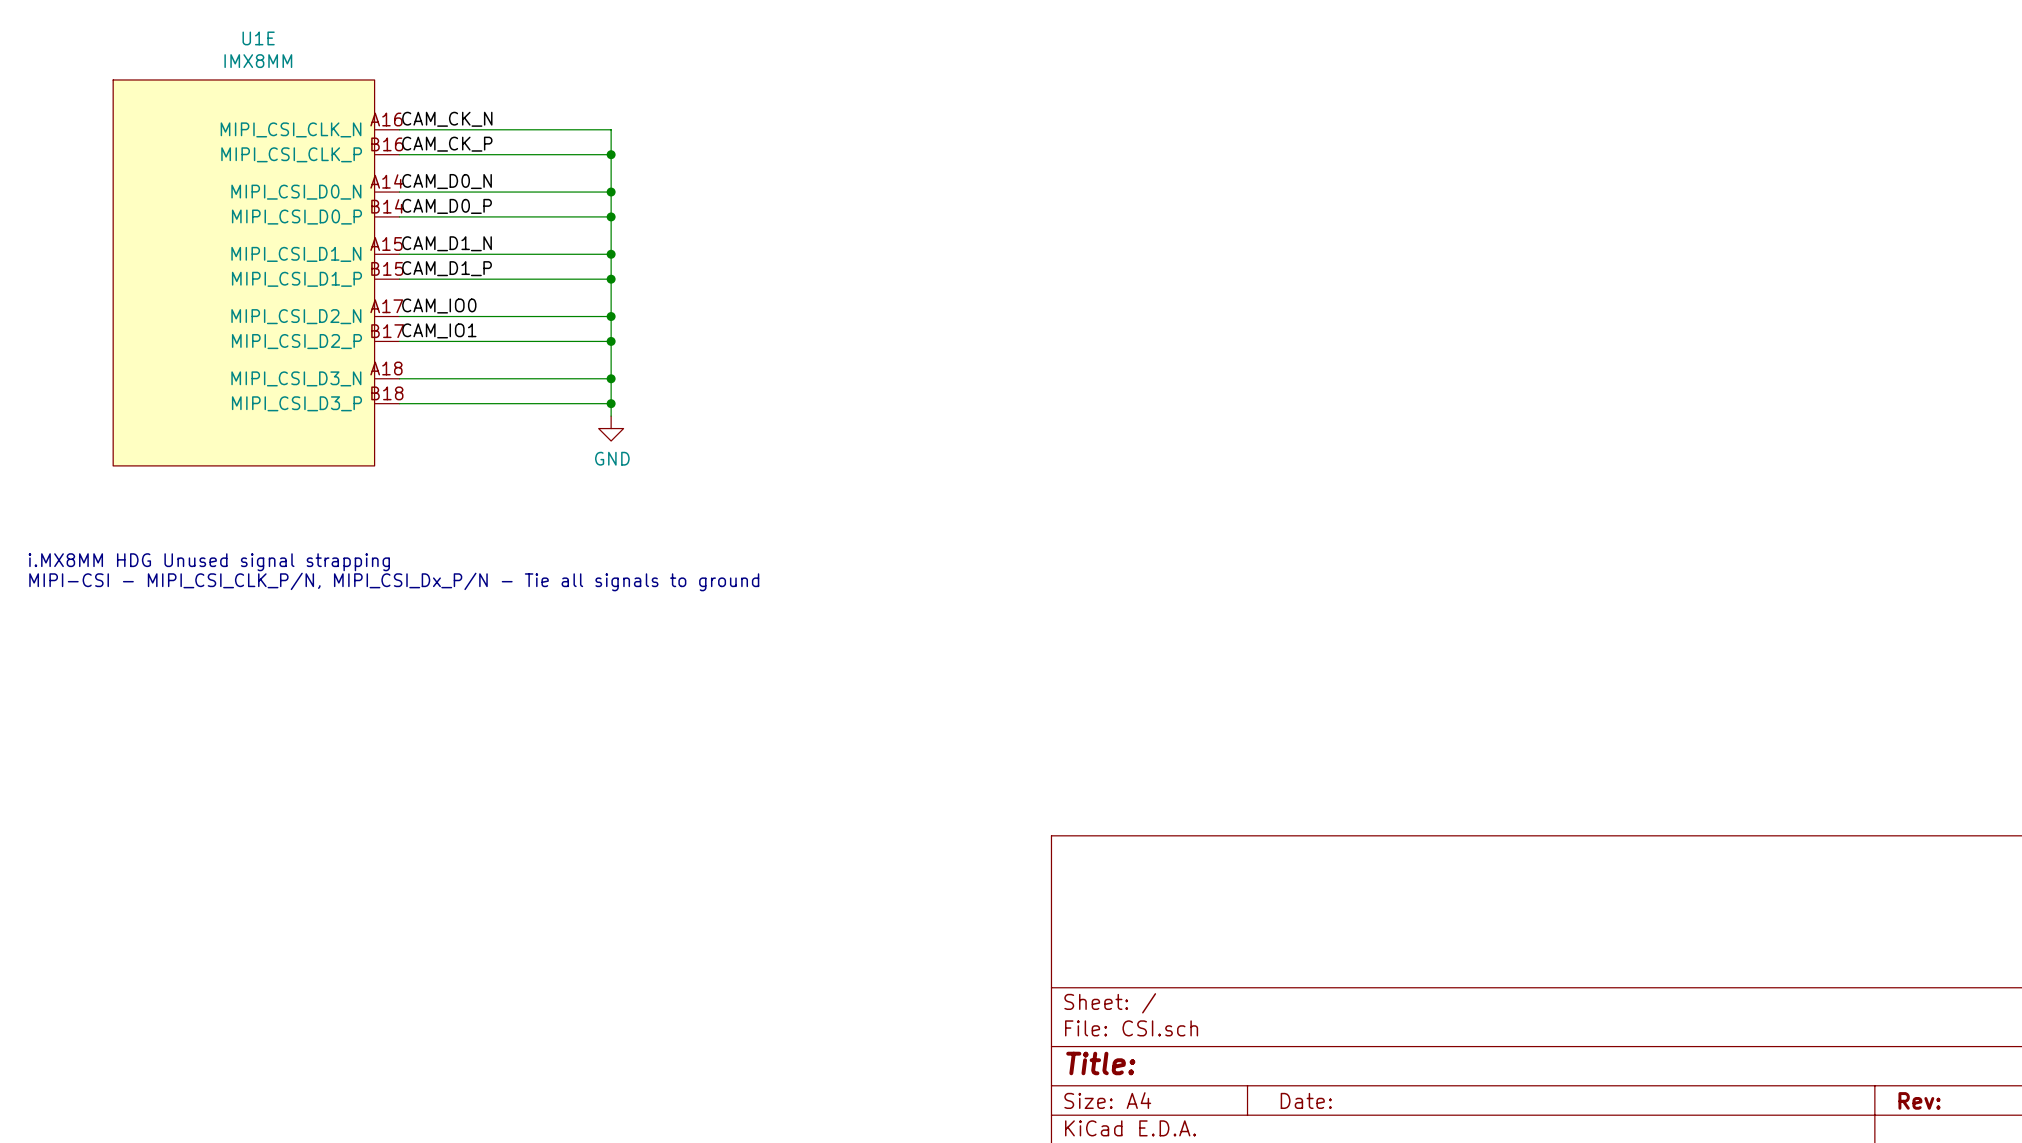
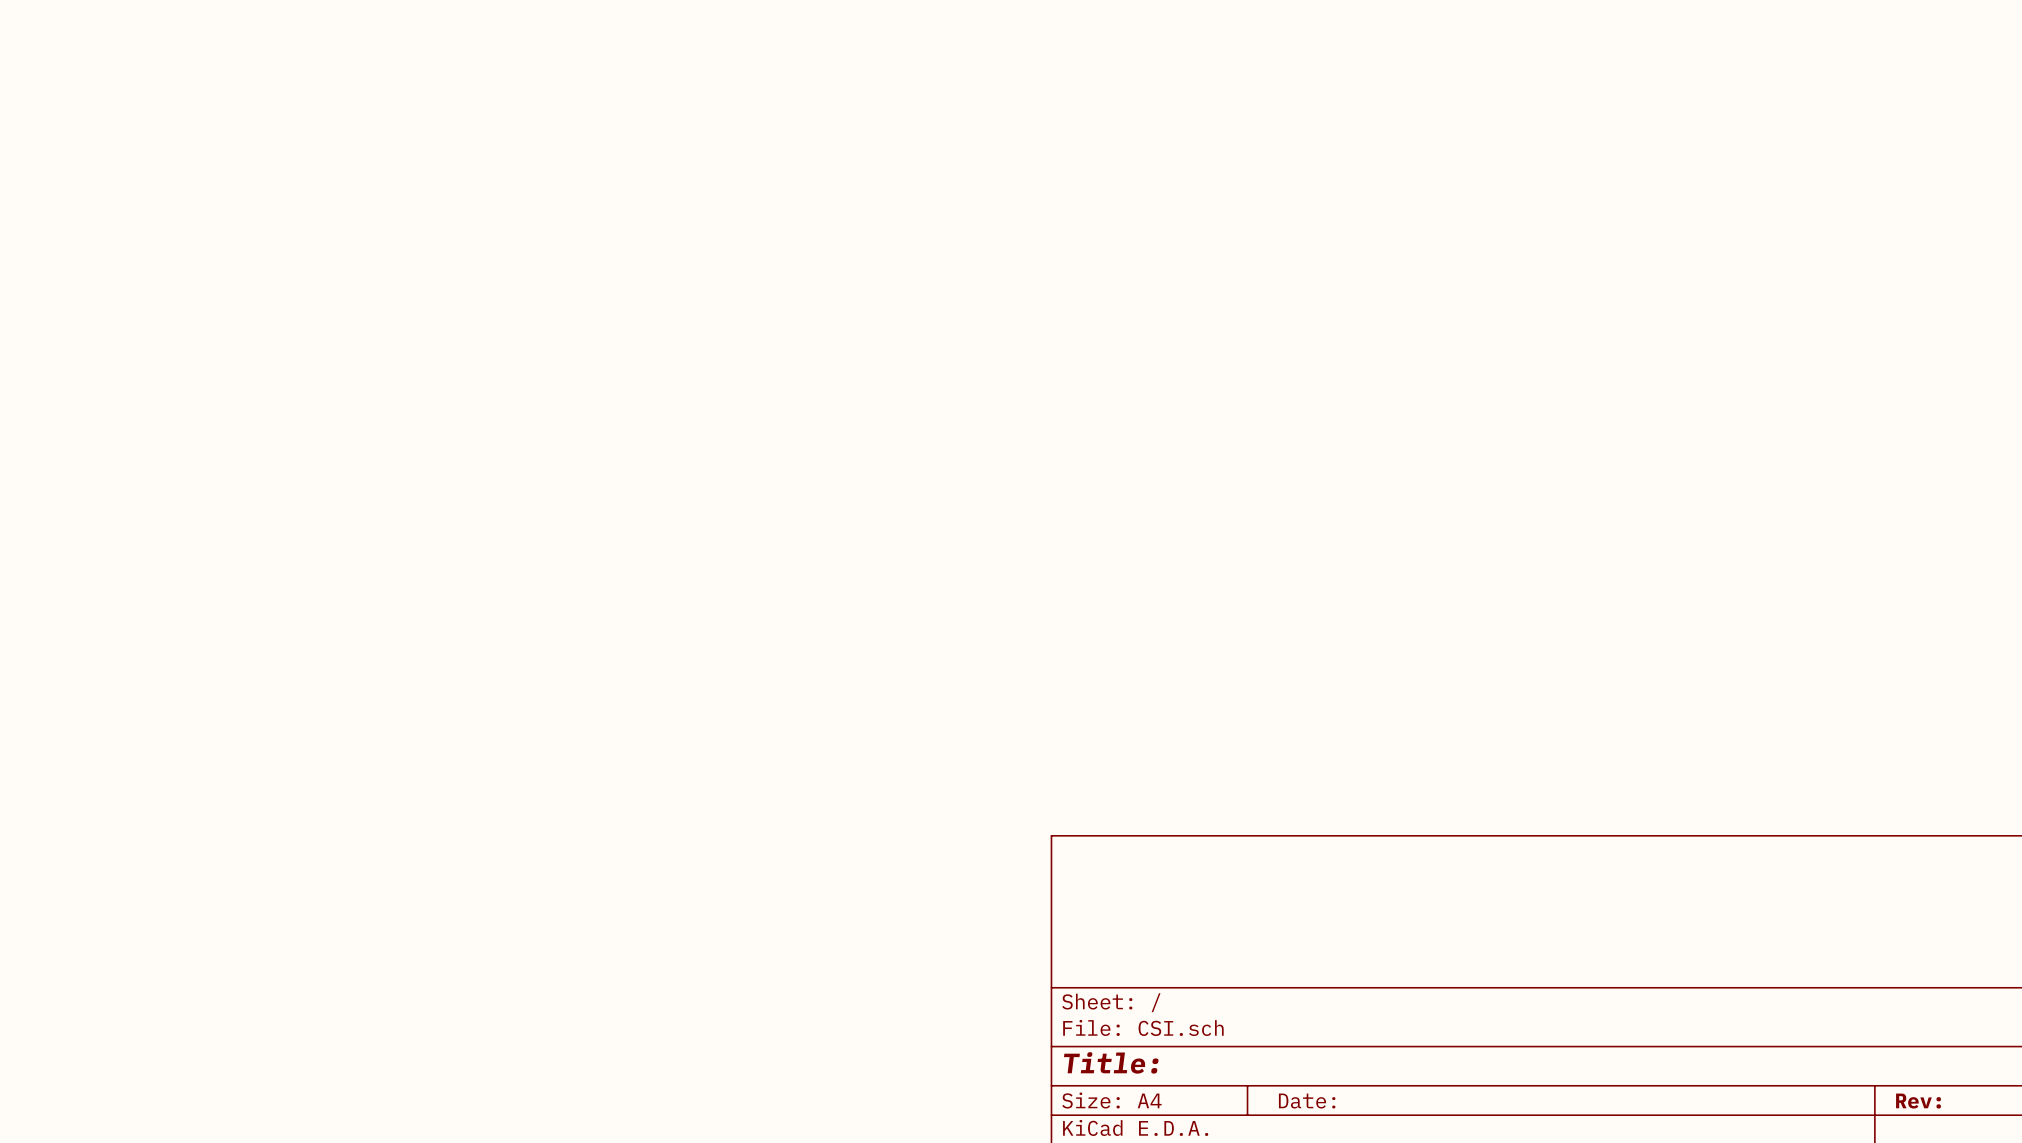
label: CAM_CK_N (447, 119) -> none
wire: (399, 129) (611, 129) (611, 416) -> none
label: CAM_CK_P (447, 144) -> none
wire: (399, 154) (611, 154) -> none
junction: (611, 154) -> none
label: CAM_D0_N (447, 181) -> none
wire: (399, 192) (611, 192) -> none
junction: (611, 192) -> none
label: CAM_D0_P (447, 206) -> none
wire: (399, 216) (611, 216) -> none
junction: (611, 216) -> none
label: CAM_D1_N (447, 243) -> none
wire: (399, 254) (611, 254) -> none
junction: (611, 254) -> none
label: CAM_D1_P (447, 268) -> none
U1E: IMX8MM (256, 272) -> none
wire: (399, 279) (611, 279) -> none
junction: (611, 279) -> none
label: CAM_IO0 (439, 306) -> none
wire: (399, 316) (611, 316) -> none
junction: (611, 316) -> none
label: CAM_IO1 (439, 330) -> none
wire: (399, 341) (611, 341) -> none
junction: (611, 341) -> none
wire: (399, 378) (611, 378) -> none
junction: (611, 378) -> none
wire: (399, 403) (611, 403) -> none
junction: (611, 403) -> none
power symbol: GND (611, 428) -> none
text: i.MX8MM HDG Unused signal strapping (209, 562) -> none
text: MIPI-CSI - MIPI_CSI_CLK_P/N, MIPI_CSI_Dx_P/N - Tie all signals to ground (394, 581) -> none

